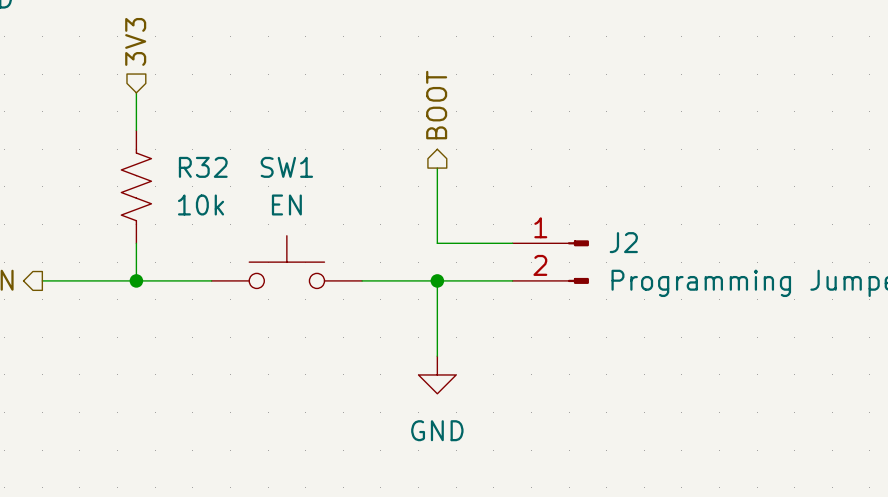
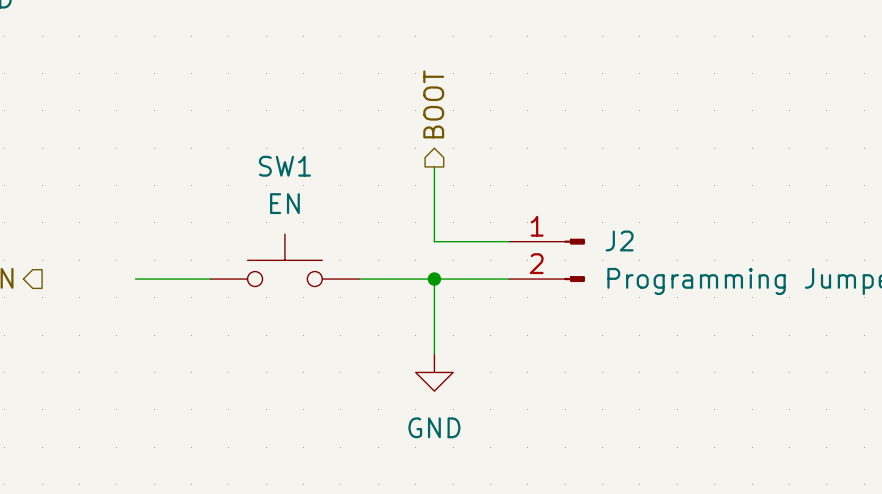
hierarchical label: 3V3 (135, 41) -> none
wire: (136, 92) (136, 130) -> none
R32: 10k (136, 186) -> none
wire: (136, 243) (136, 280) (42, 280) -> none
junction: (136, 280) -> none

